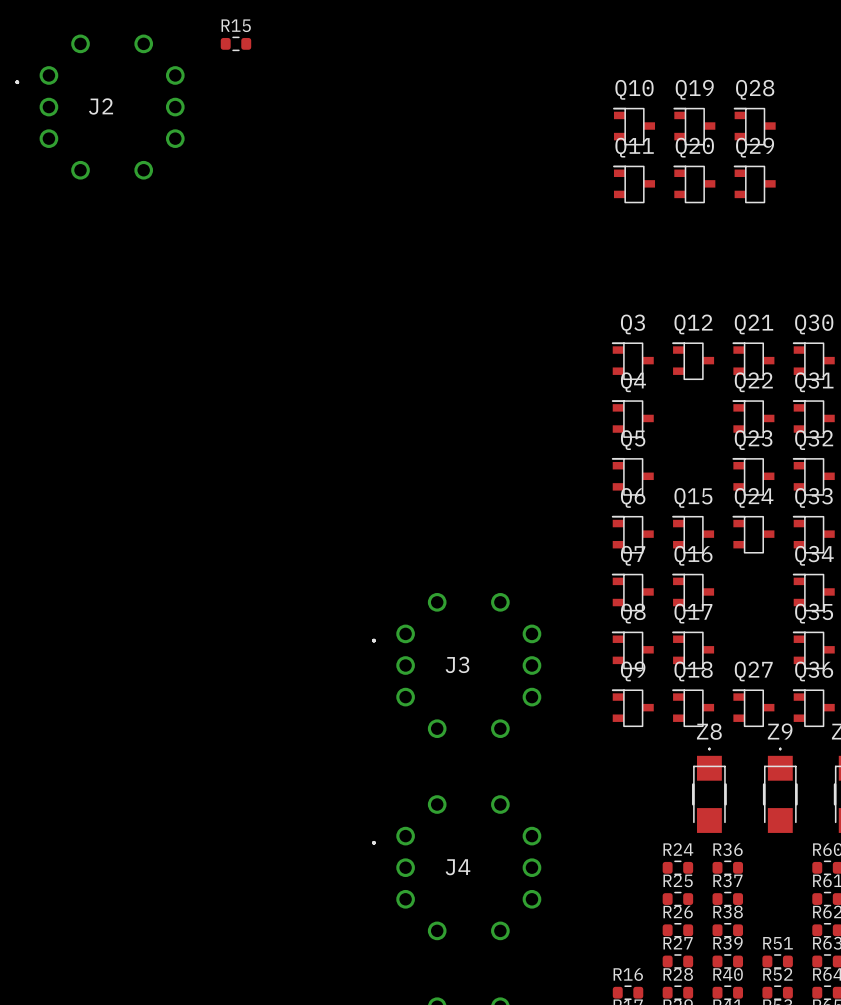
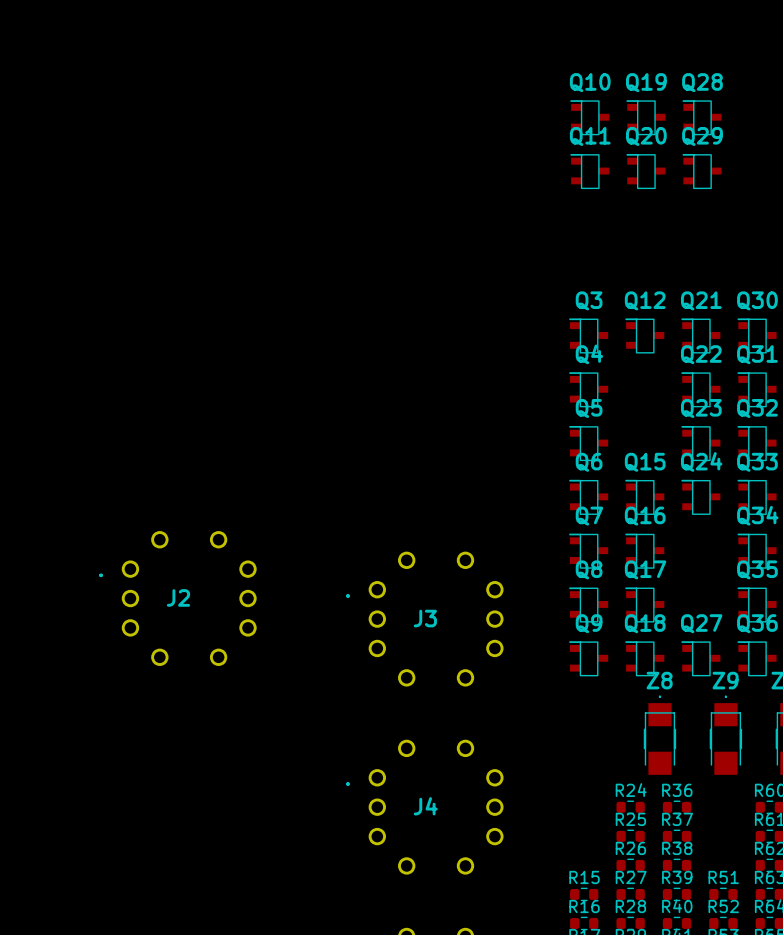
J2 footprint: [15, 34, 185, 180] -> [99, 531, 257, 666]
R15 position: (235, 43) -> (584, 894)

